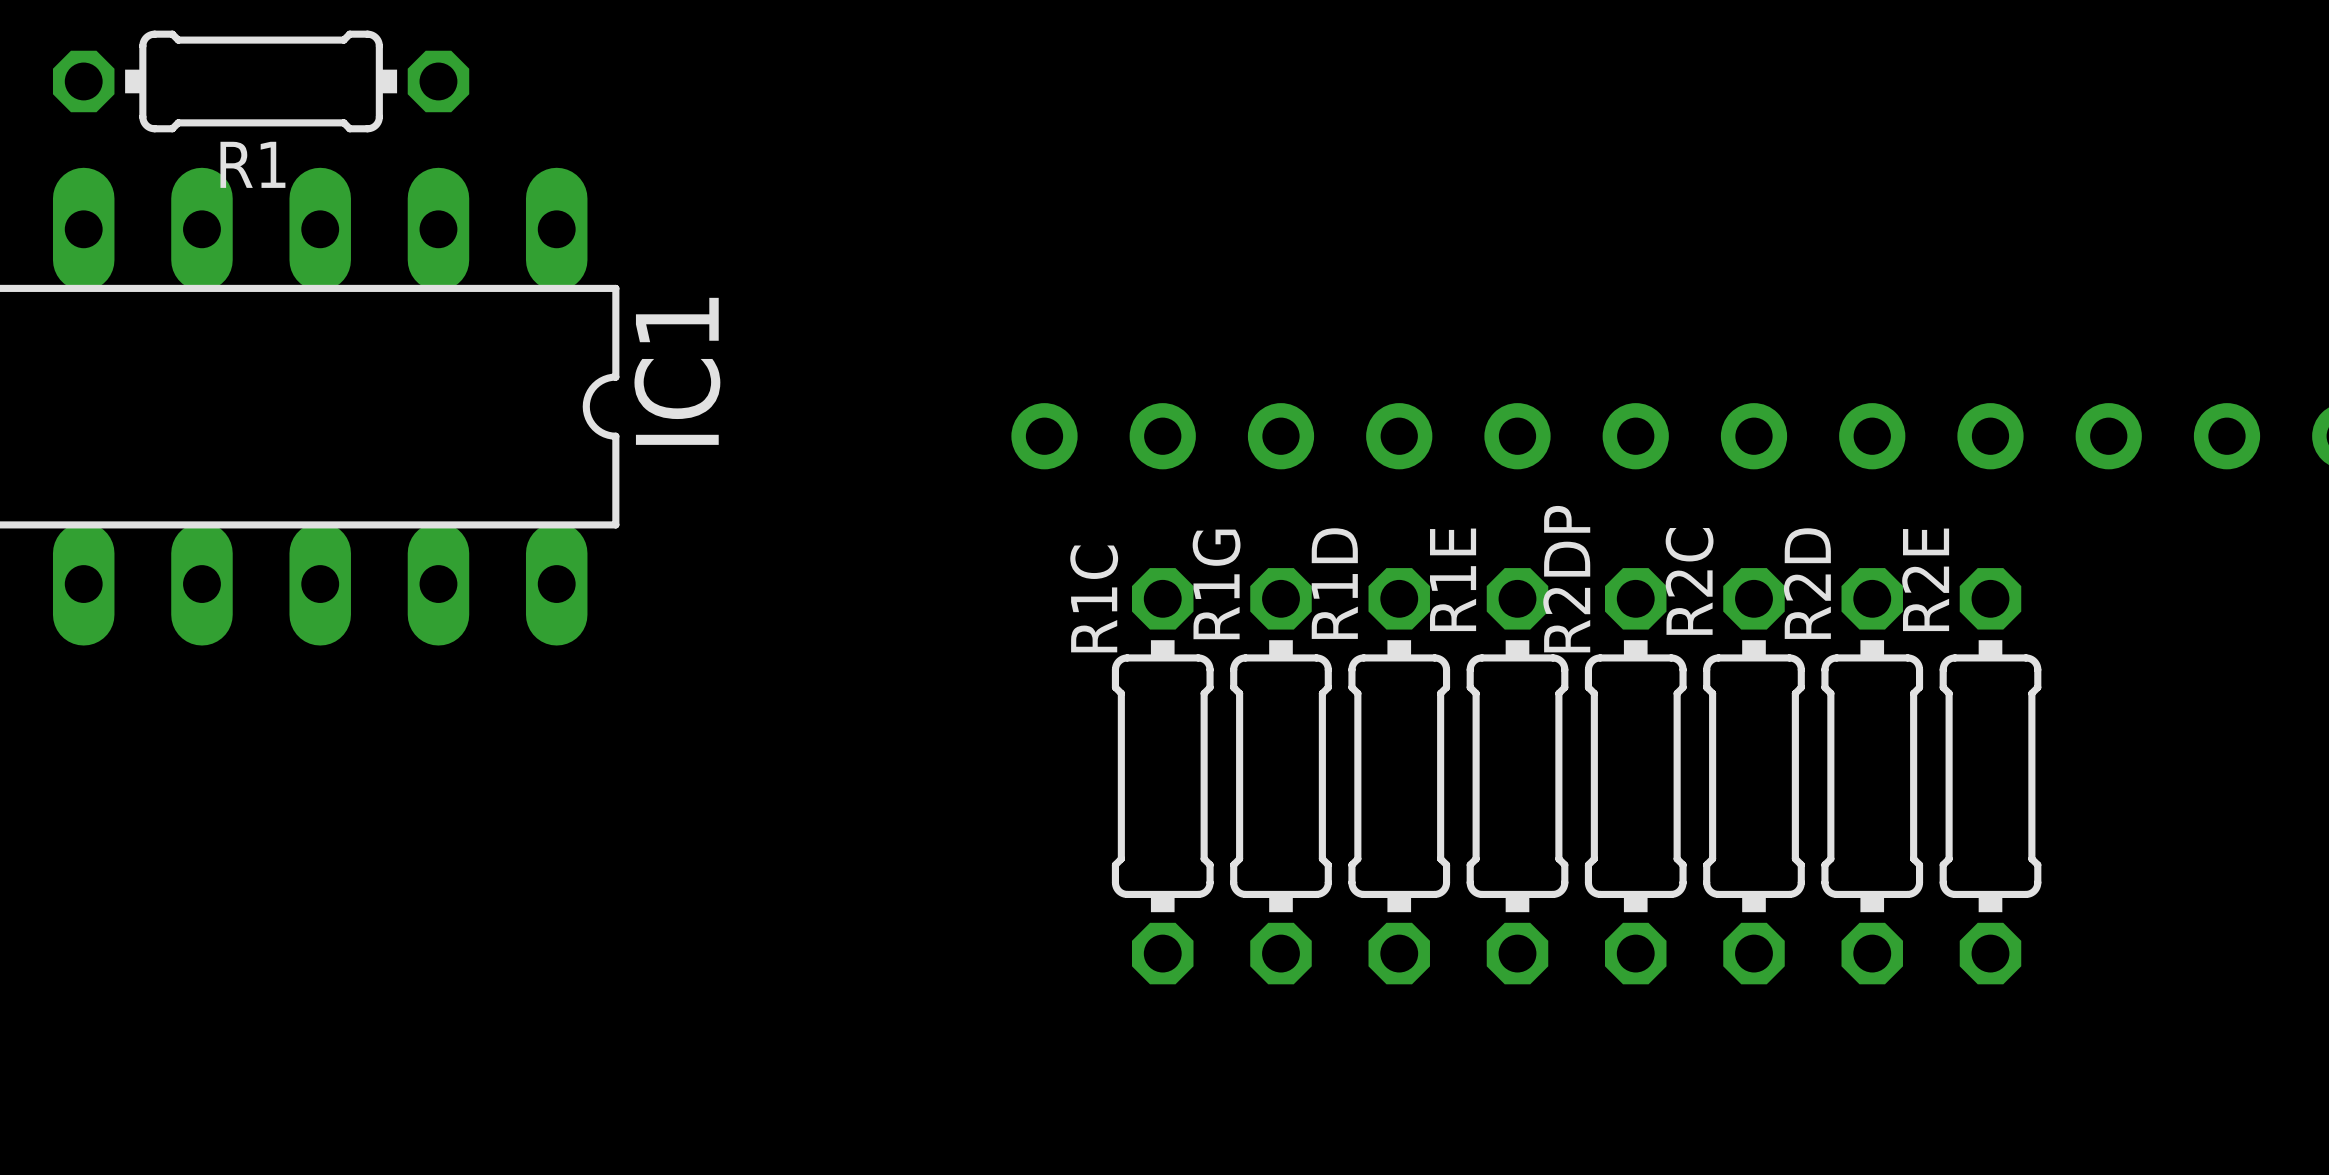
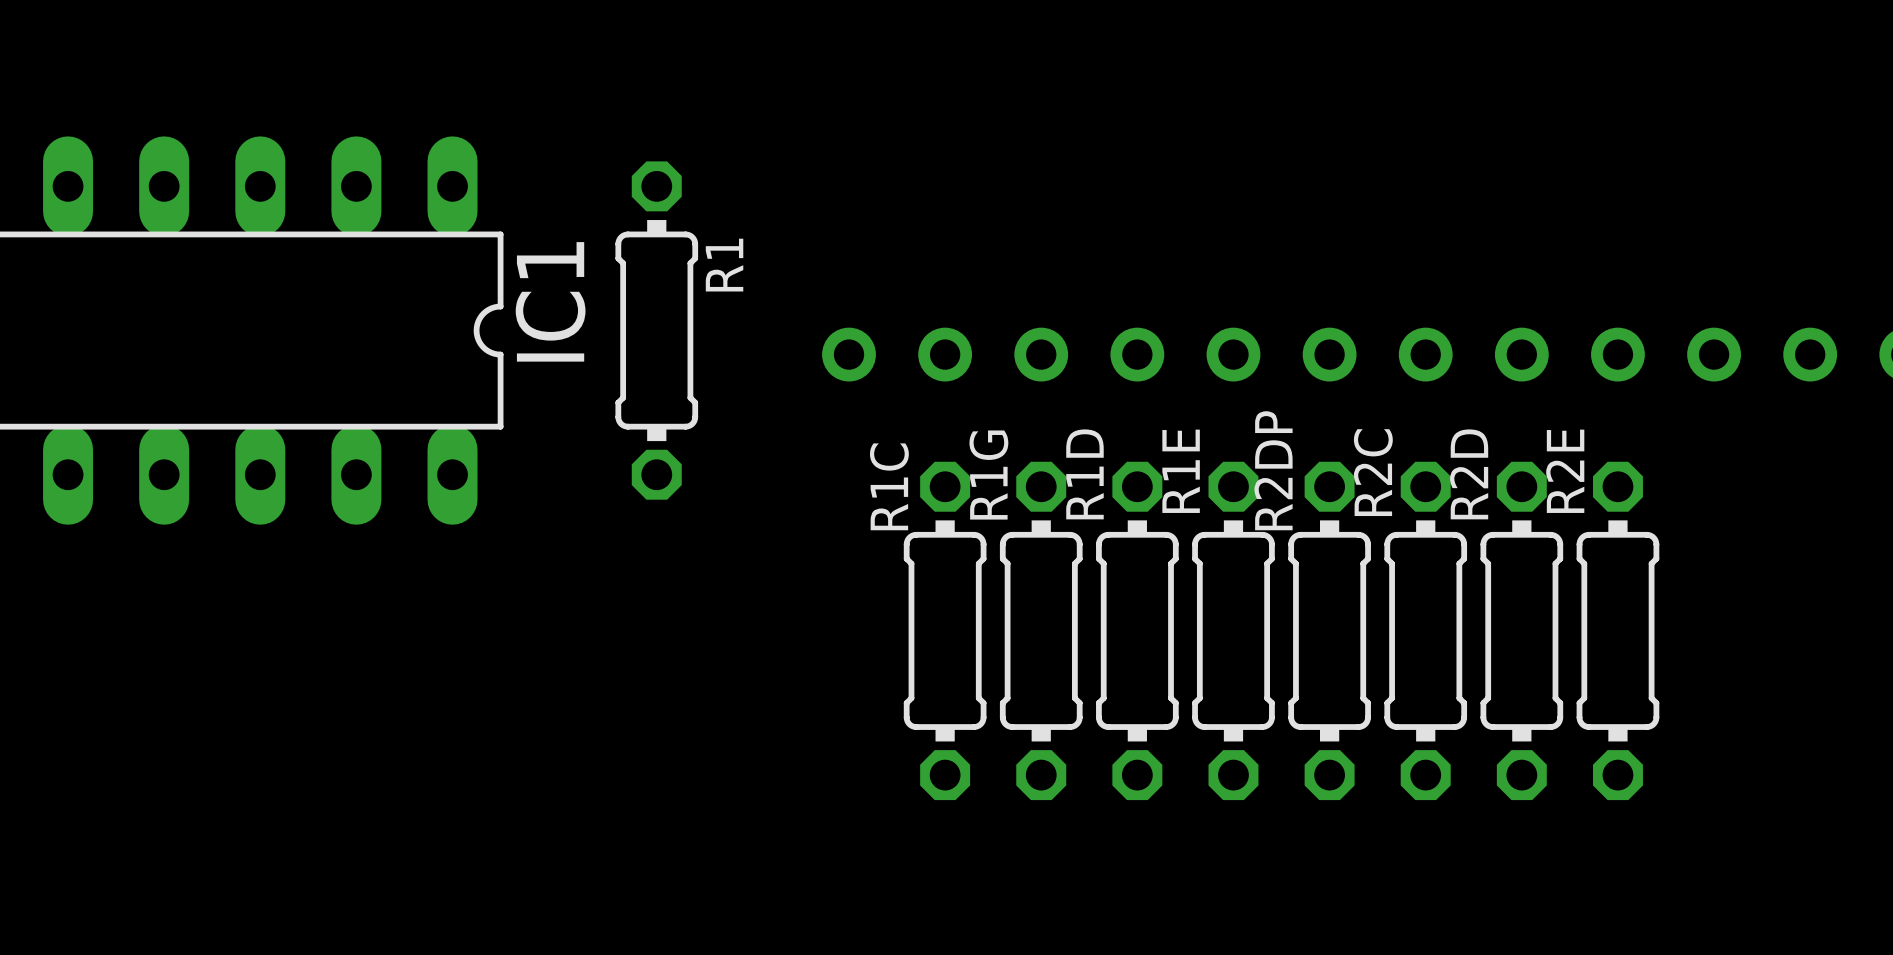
R1 rotation: 0° (261, 81) -> 90° clockwise (656, 330)
R1 position: (261, 81) -> (656, 330)
R1 name position: R1 (252, 164) -> R1 (724, 265)

